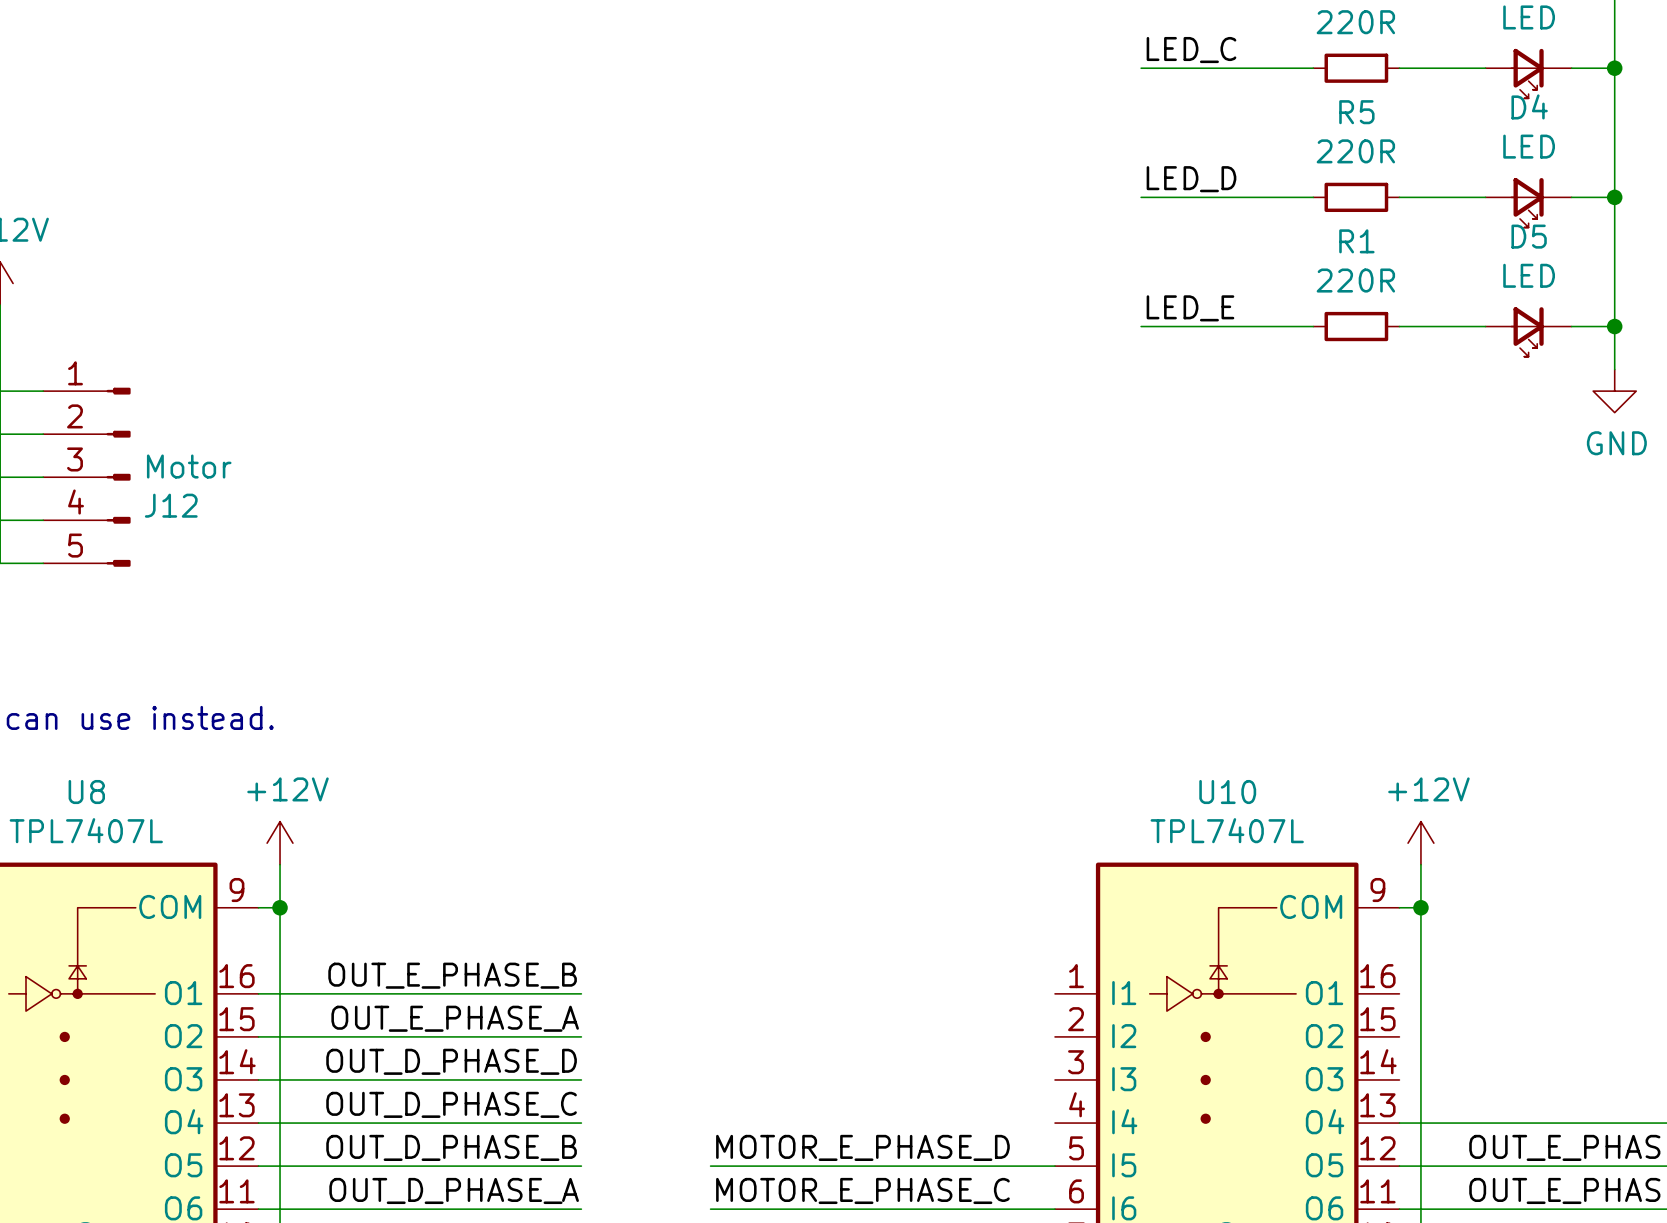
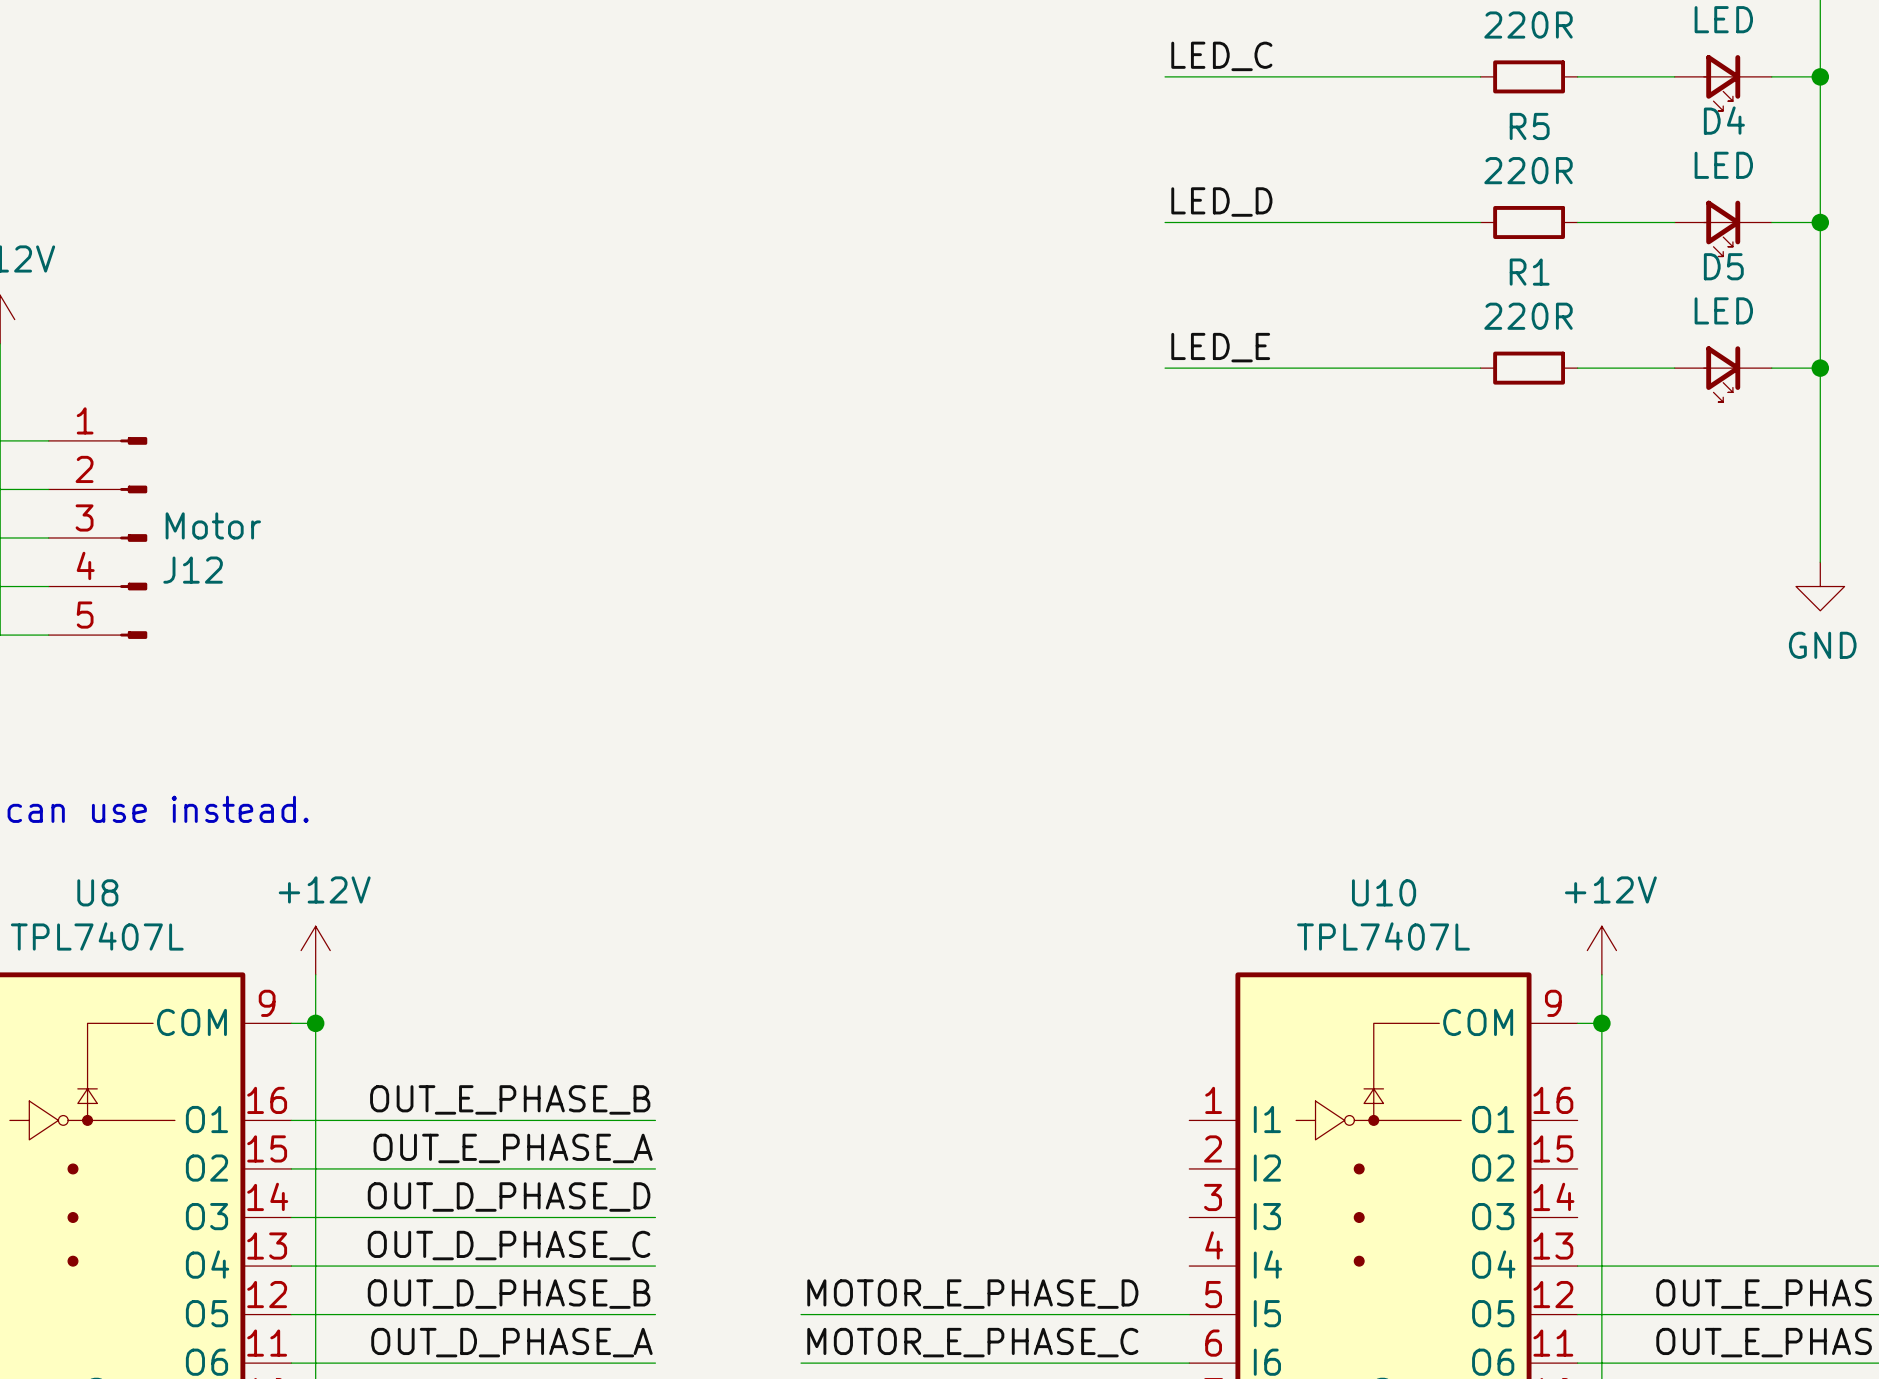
label position: LED_C (1191, 50) -> LED_C (1221, 56)
wire: none -> (1165, 76) (1286, 76)
label position: LED_D (1191, 179) -> LED_D (1221, 202)
wire: none -> (1165, 222) (1286, 222)
label position: LED_E (1190, 308) -> LED_E (1220, 347)
wire: none -> (1165, 368) (1286, 368)
wire: none -> (1820, 416) (1820, 562)
power symbol position: GND (1614, 391) -> GND (1820, 586)

